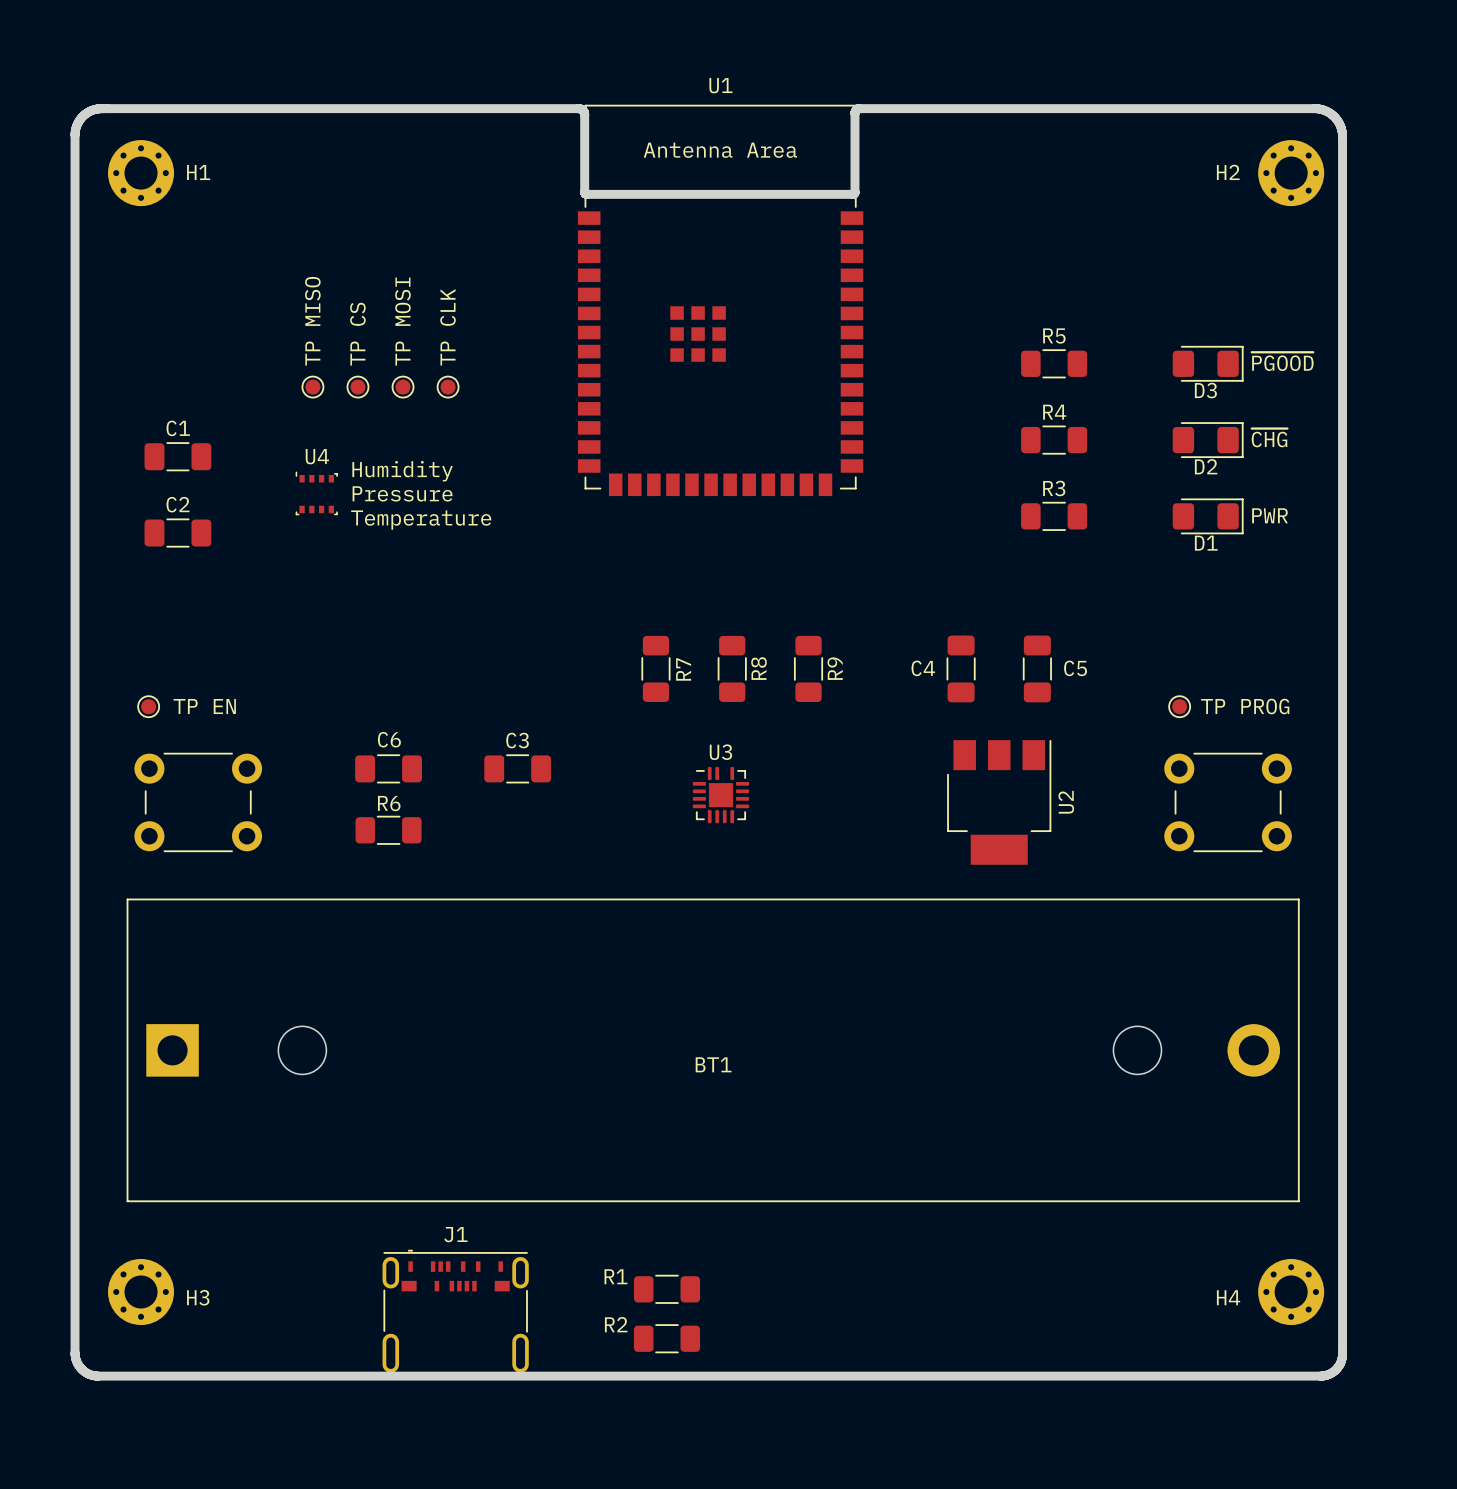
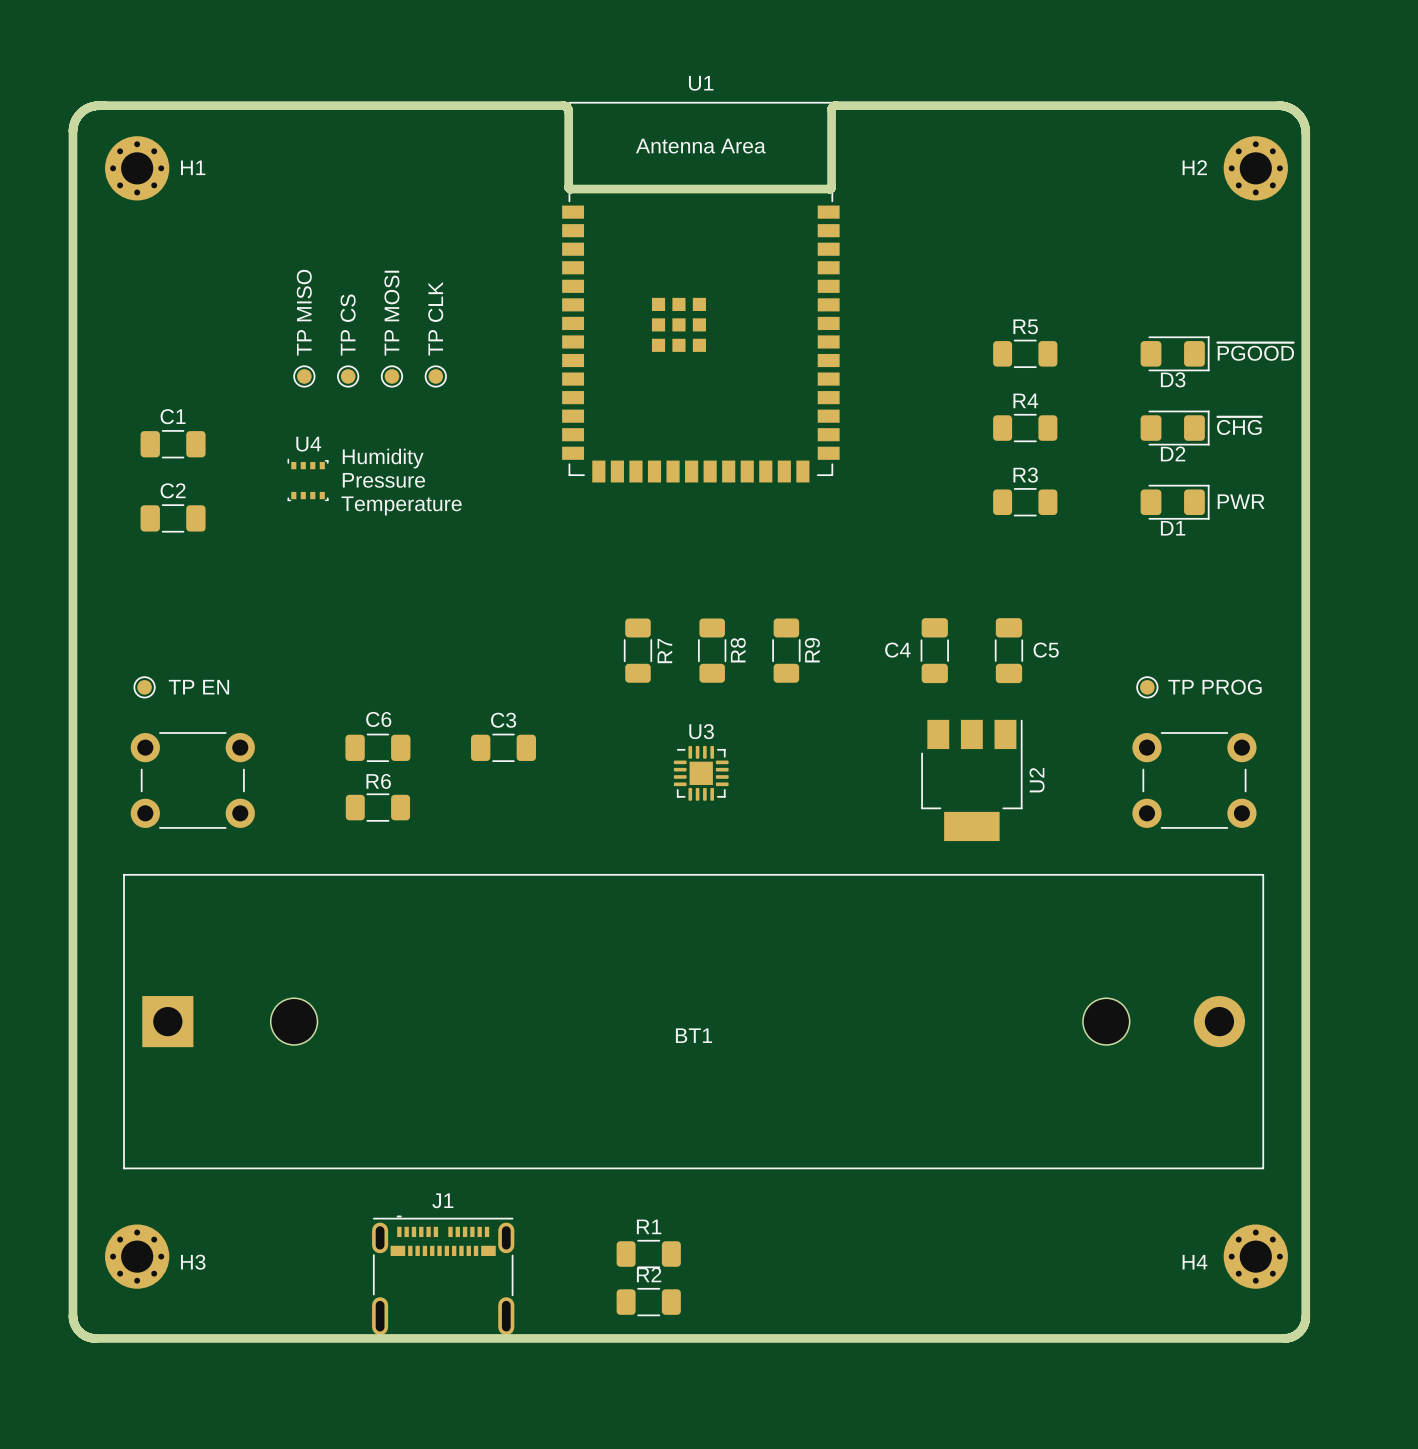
U3 footprint: [692, 766, 750, 824] -> [673, 745, 729, 801]
J1 footprint: [382, 1249, 529, 1373] -> [372, 1215, 515, 1342]
R1 name position: R1 (615, 1276) -> R1 (649, 1226)
R2 name position: R2 (616, 1324) -> R2 (649, 1274)

